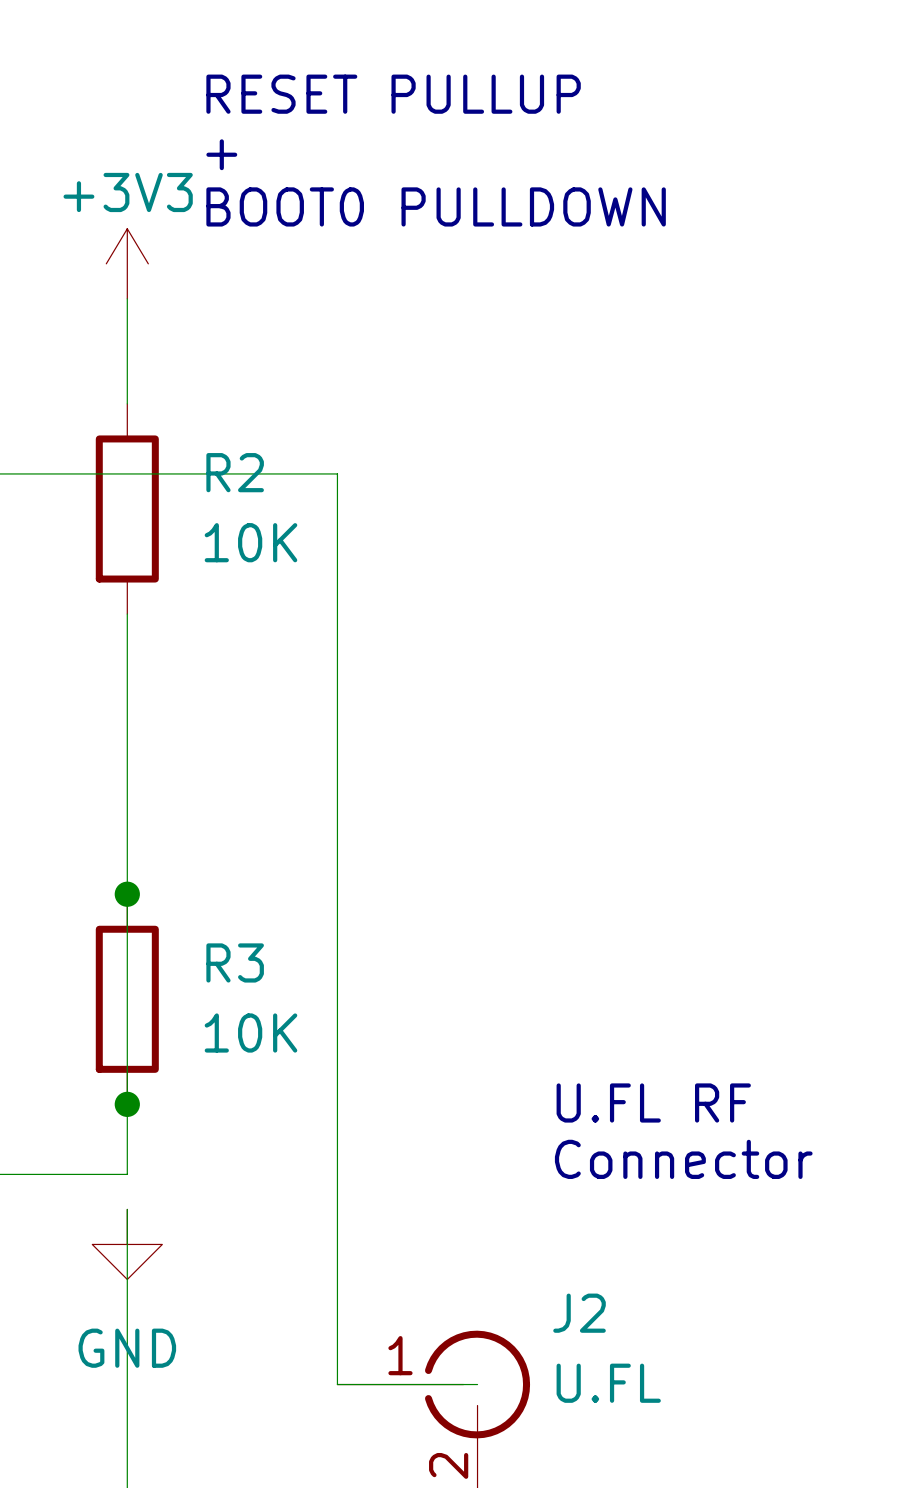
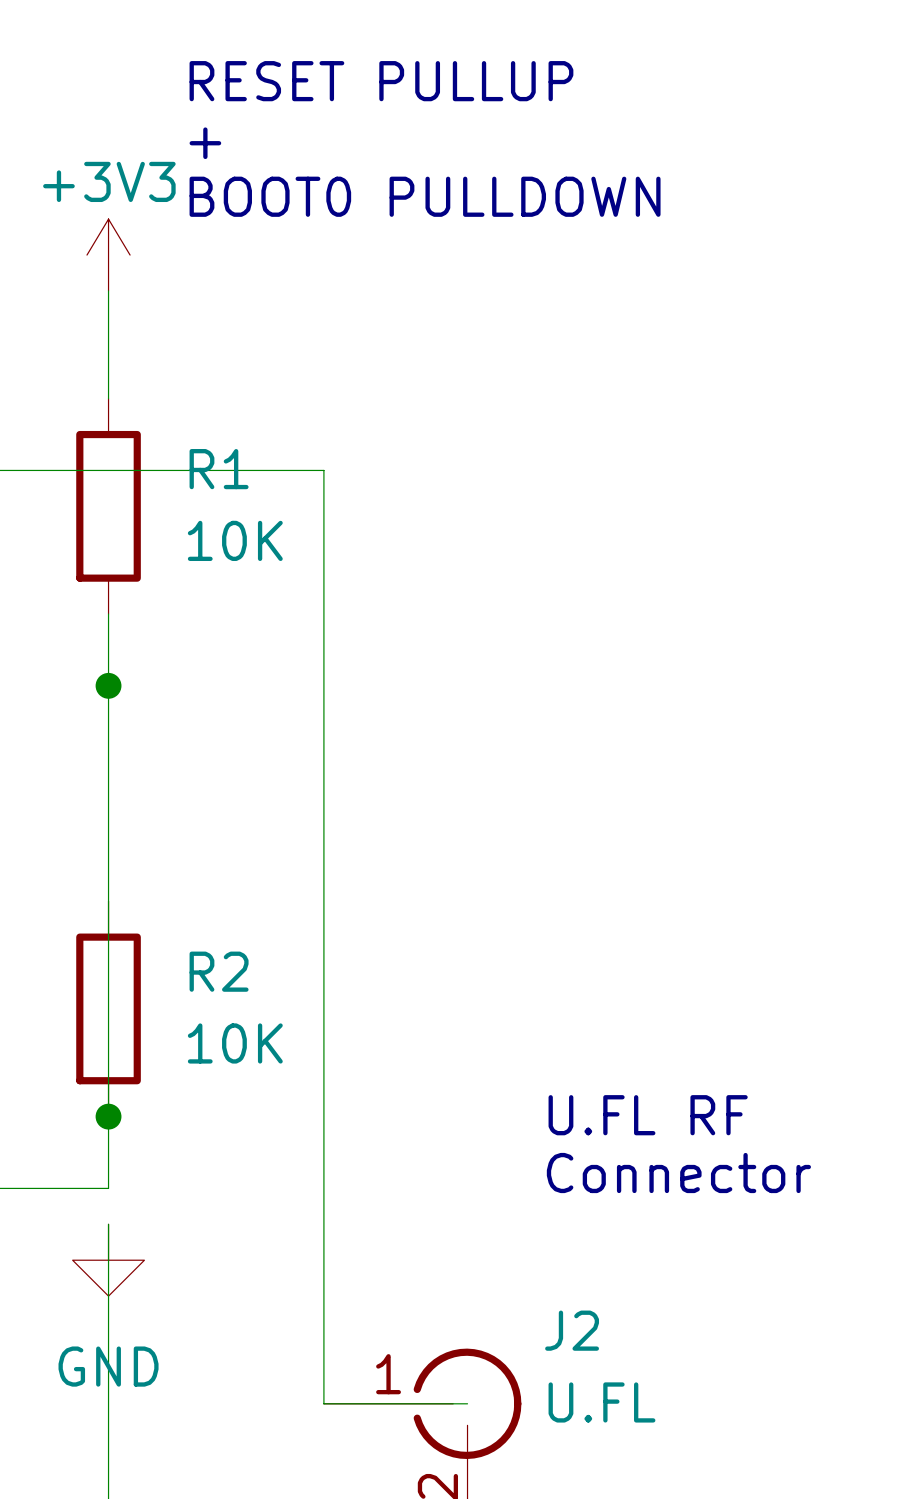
R2 name: R2 (235, 472) -> R1 (219, 469)
junction: none -> (108, 685)
junction: (127, 894) -> none
R3 name: R3 (235, 962) -> R2 (219, 971)

